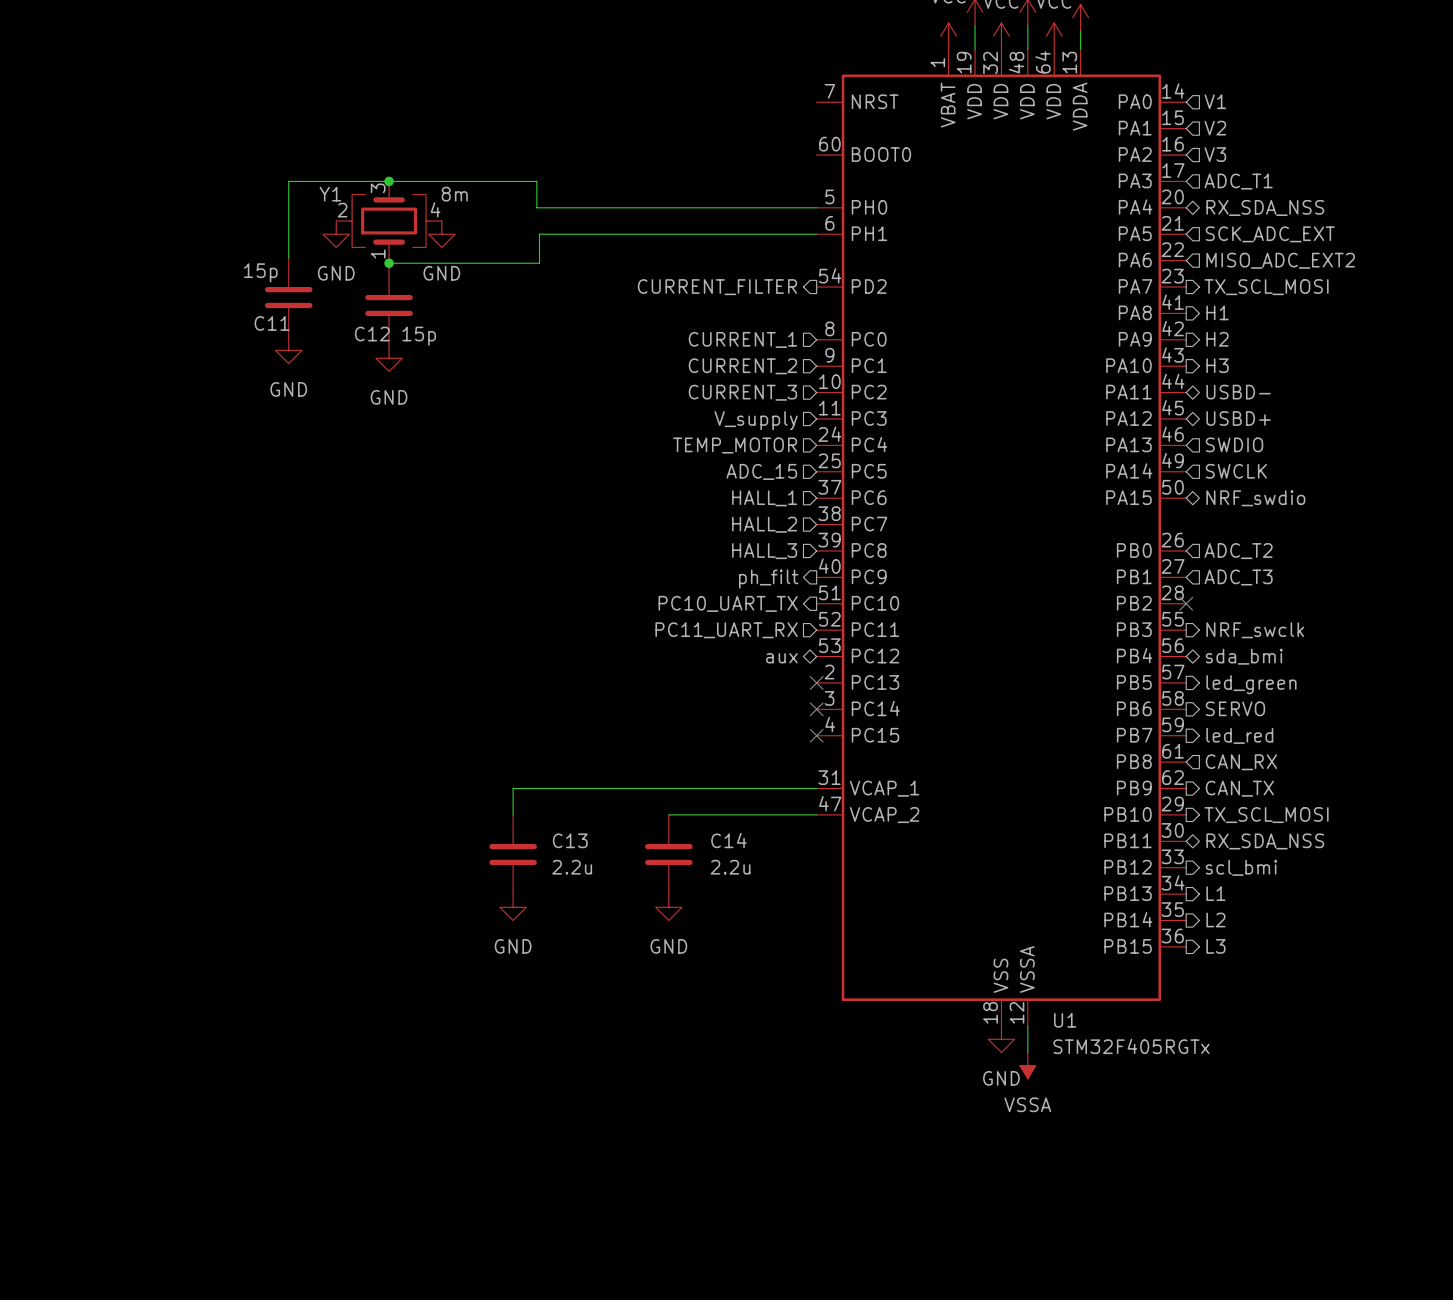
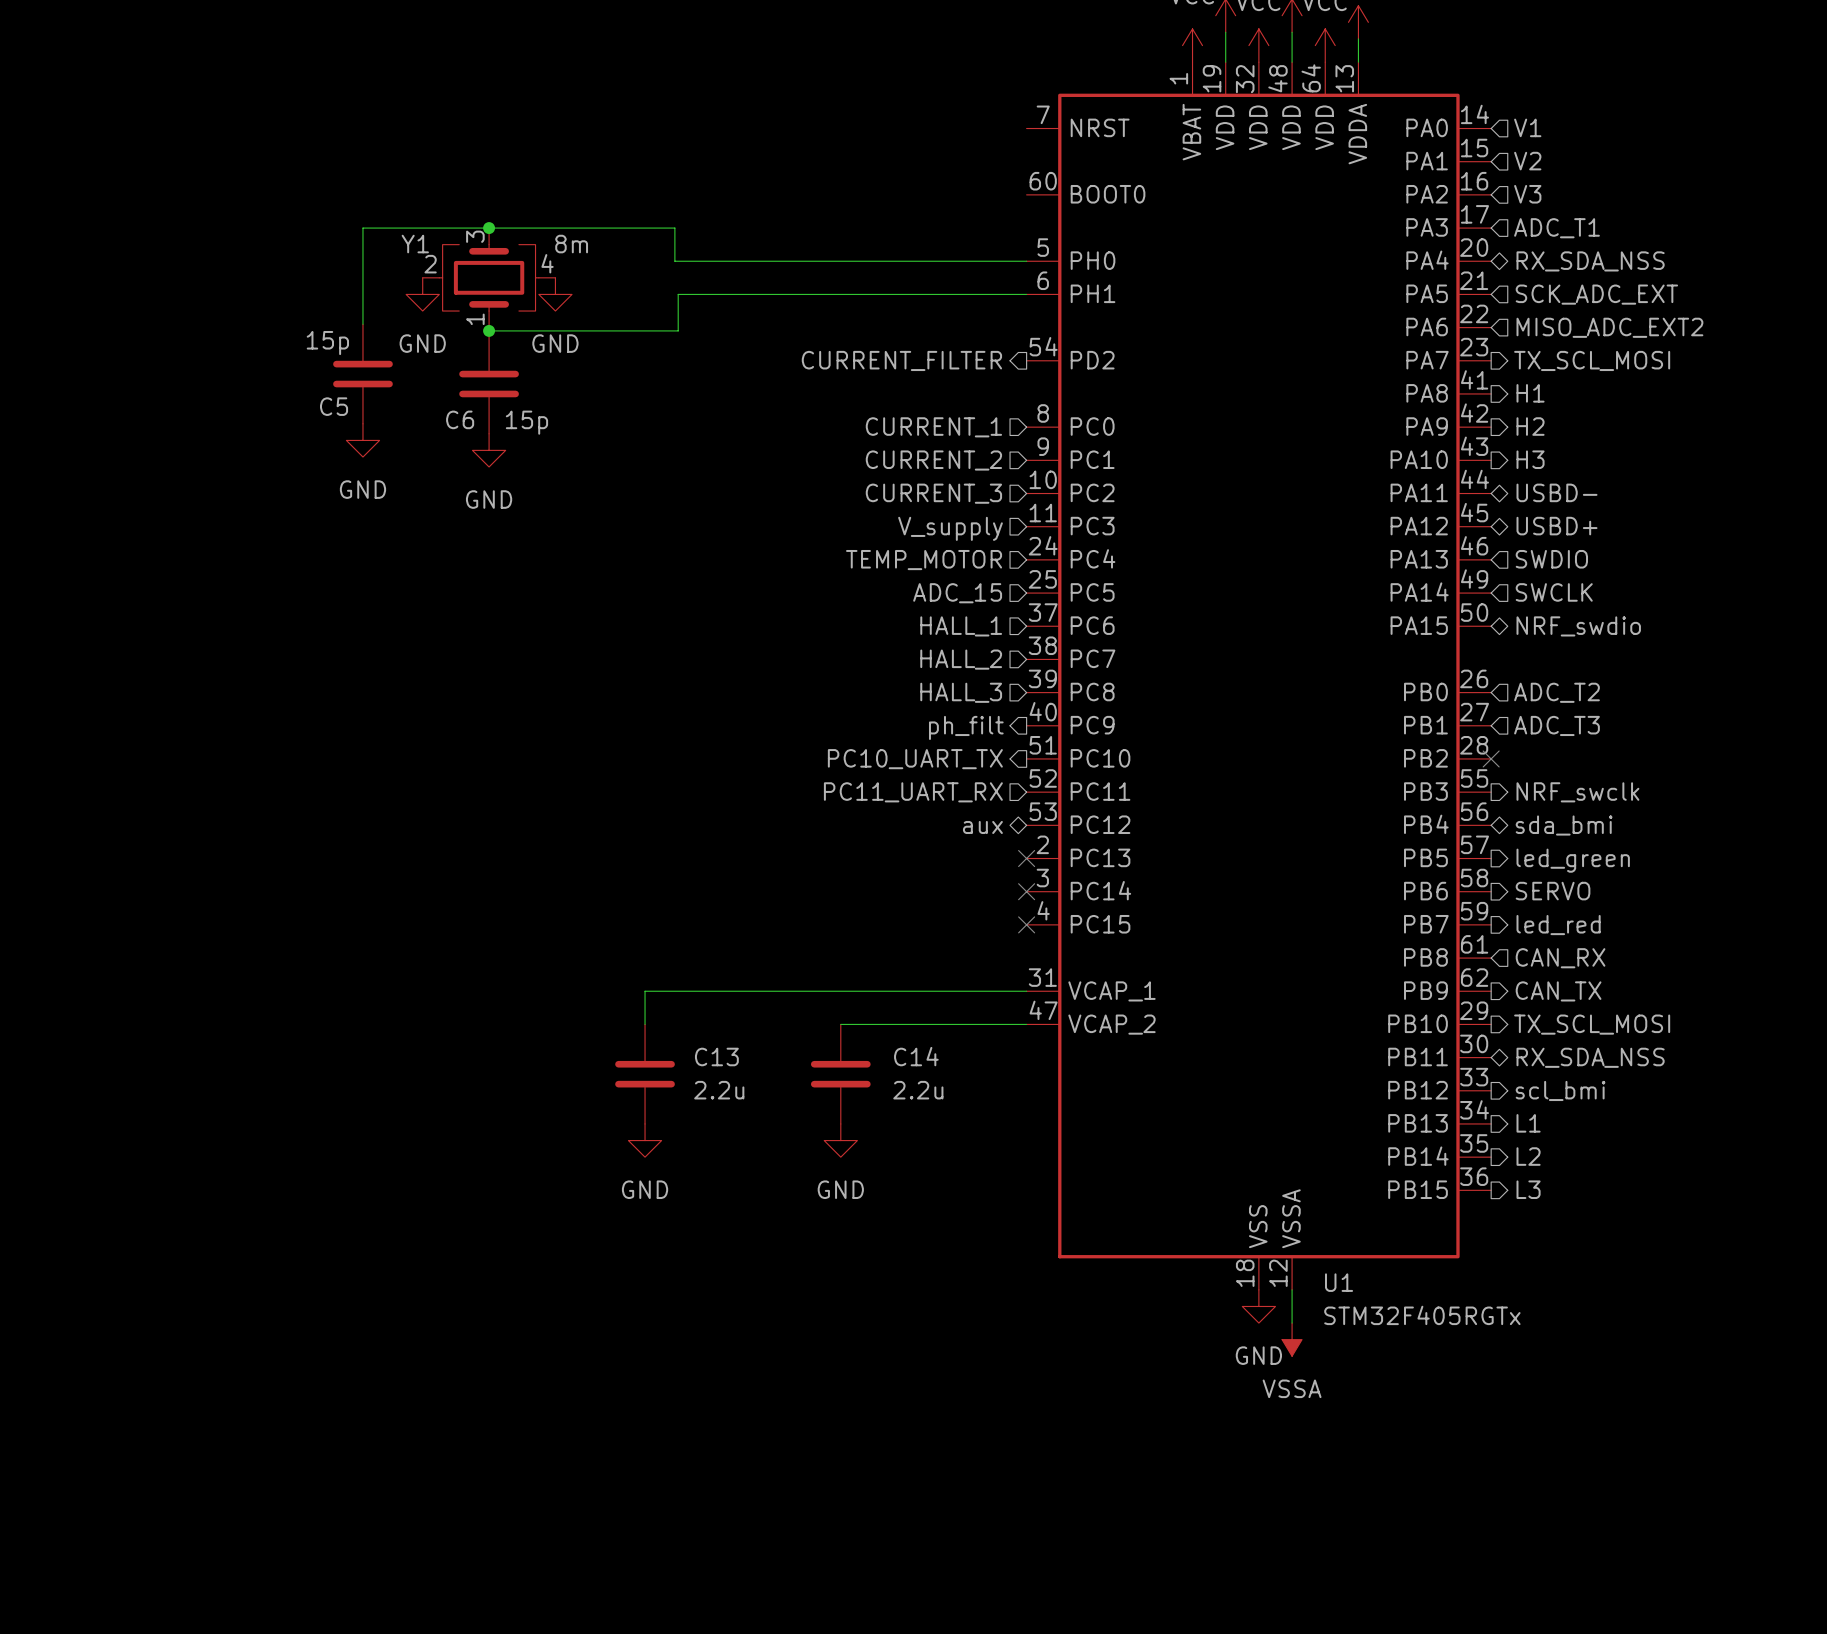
C11 name: C11 (272, 323) -> C5 (334, 406)
C12 name: C12 (372, 334) -> C6 (460, 419)

